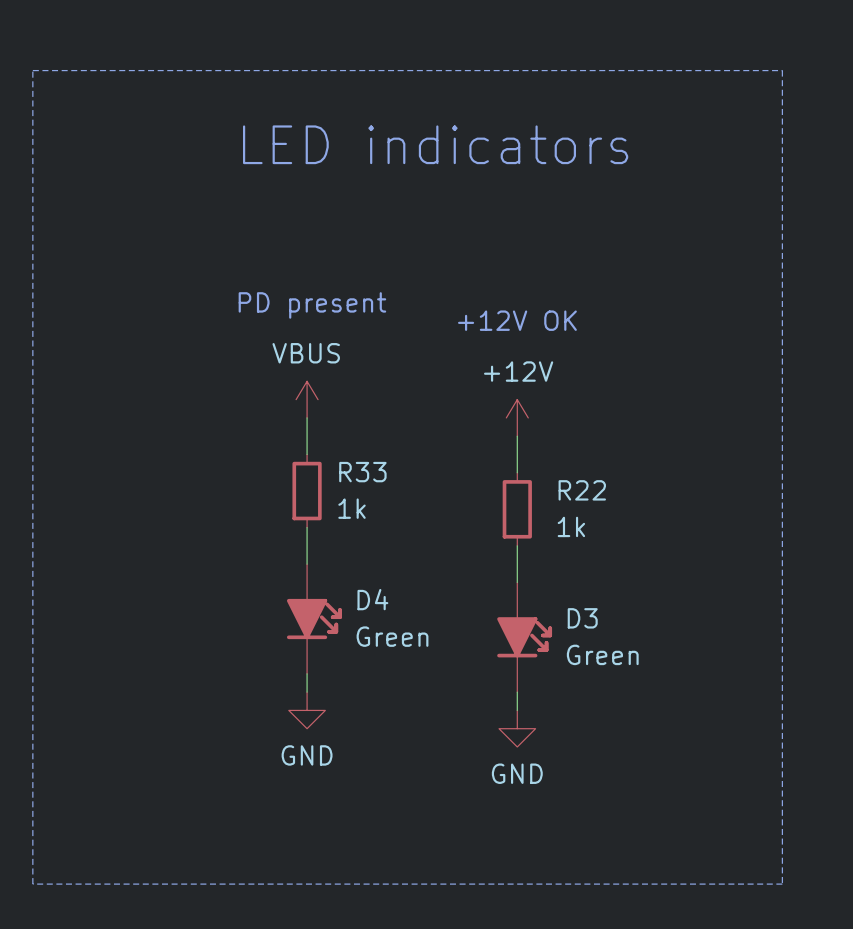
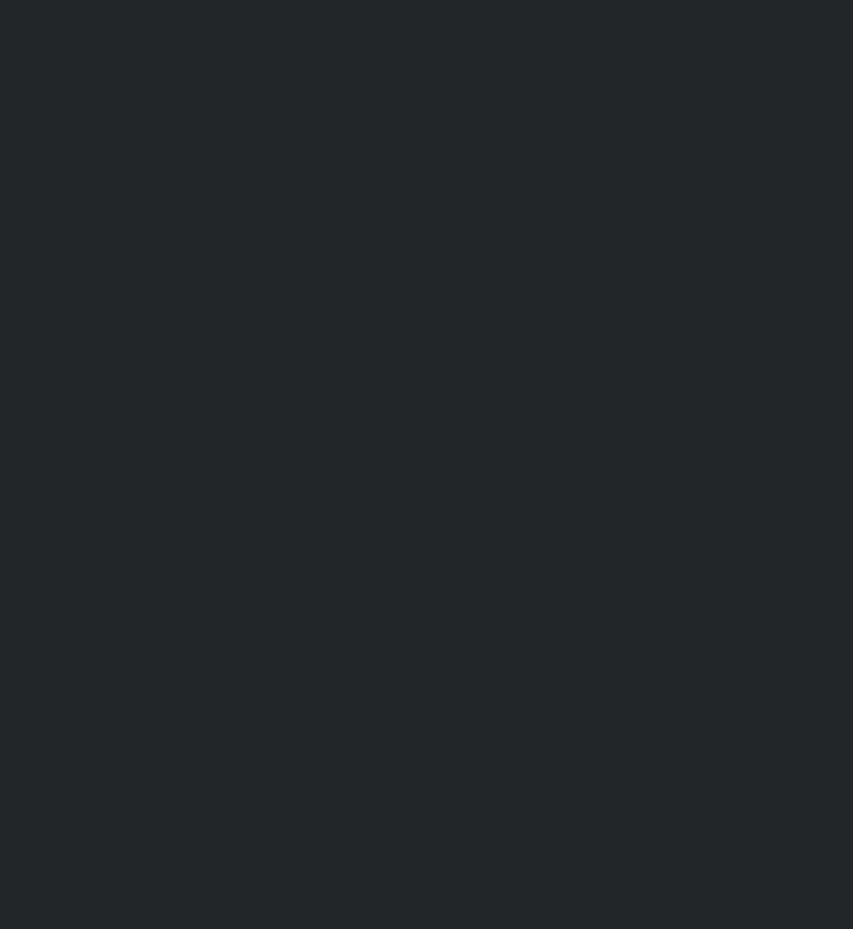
line: (32, 70) (782, 70) (782, 884) (32, 884) (32, 70) -> none
text: LED indicators (435, 144) -> none
text: PD present (312, 305) -> none
text: +12V OK (517, 320) -> none
power symbol: VBUS (307, 399) -> none
wire: (307, 417) (307, 454) -> none
power symbol: +12V (517, 417) -> none
wire: (517, 436) (517, 472) -> none
R33: (307, 491) -> none
R22: (517, 509) -> none
wire: (307, 527) (307, 564) -> none
wire: (517, 545) (517, 582) -> none
D4: (314, 619) -> none
D3: (524, 637) -> none
wire: (307, 673) (307, 692) -> none
wire: (517, 692) (517, 710) -> none
power symbol: GND (307, 710) -> none
power symbol: GND (517, 728) -> none

